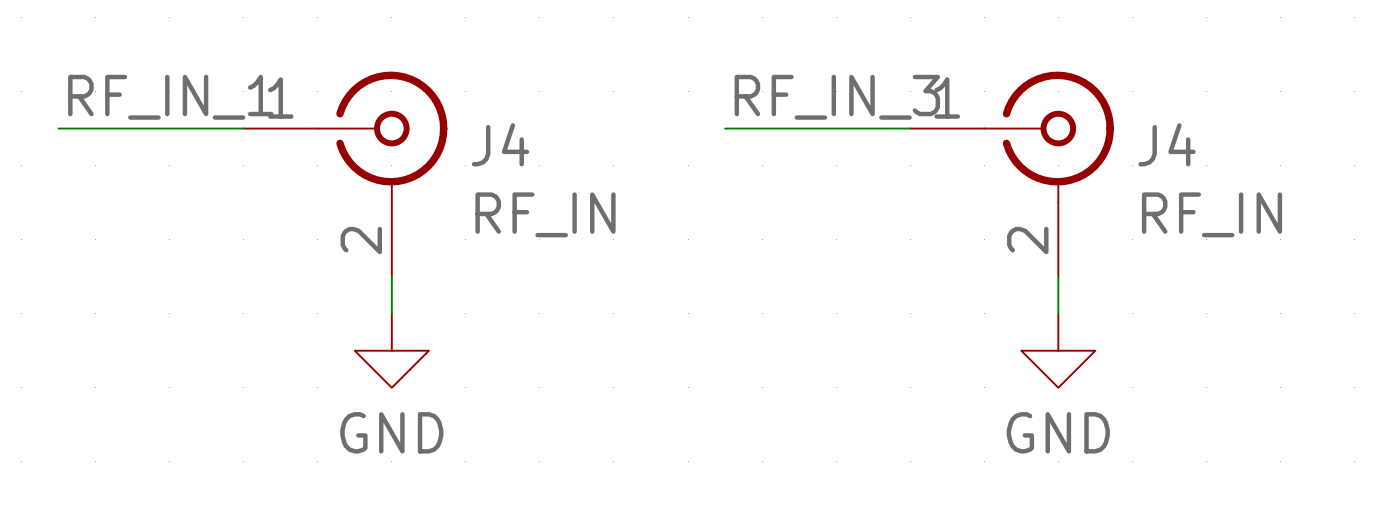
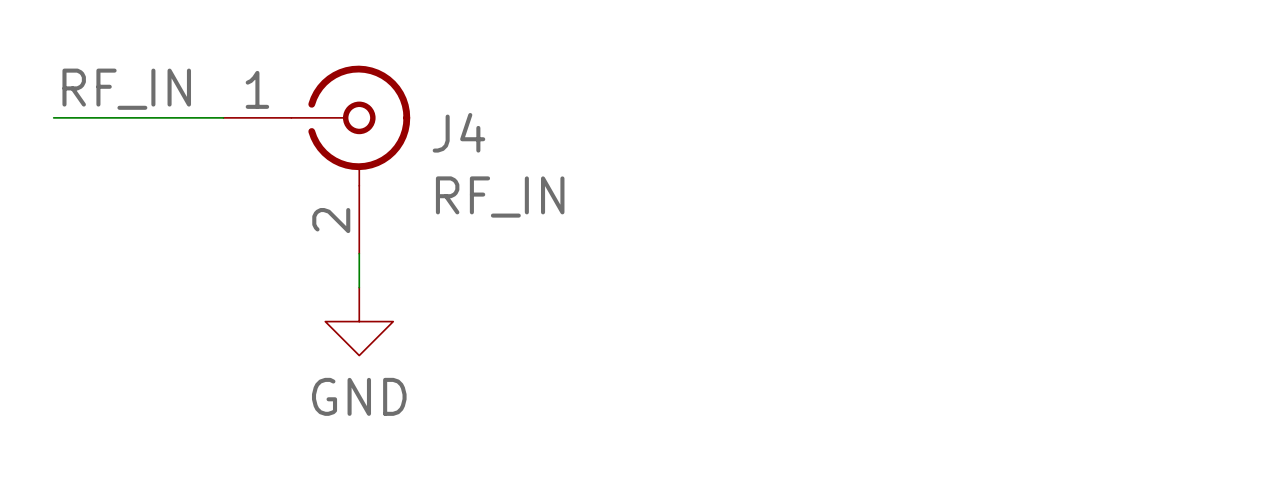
label: RF_IN_1 (170, 97) -> RF_IN (126, 89)
label: RF_IN_3 (837, 97) -> none
wire: (725, 128) (910, 128) -> none
J4: RF_IN (1012, 174) -> none
wire: (1058, 276) (1058, 313) -> none
power symbol: GND (1058, 350) -> none

